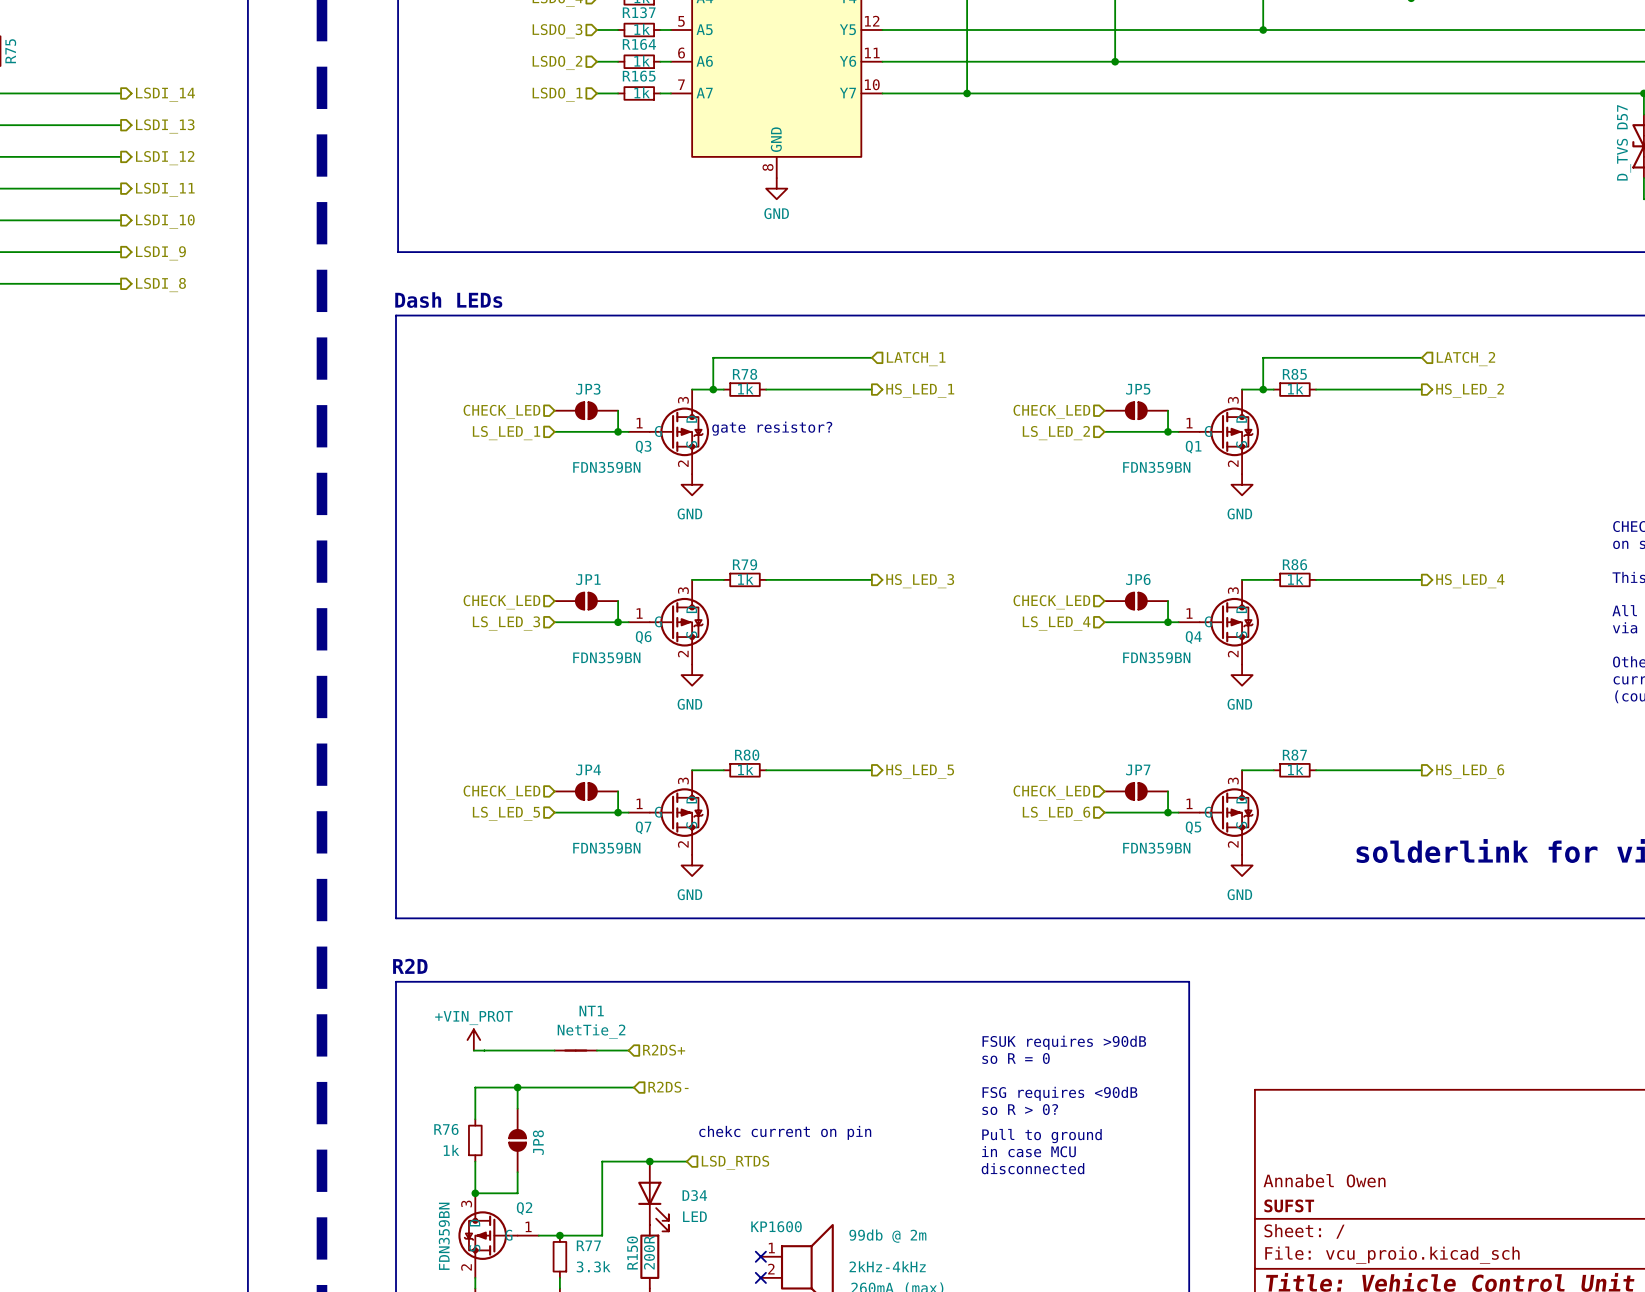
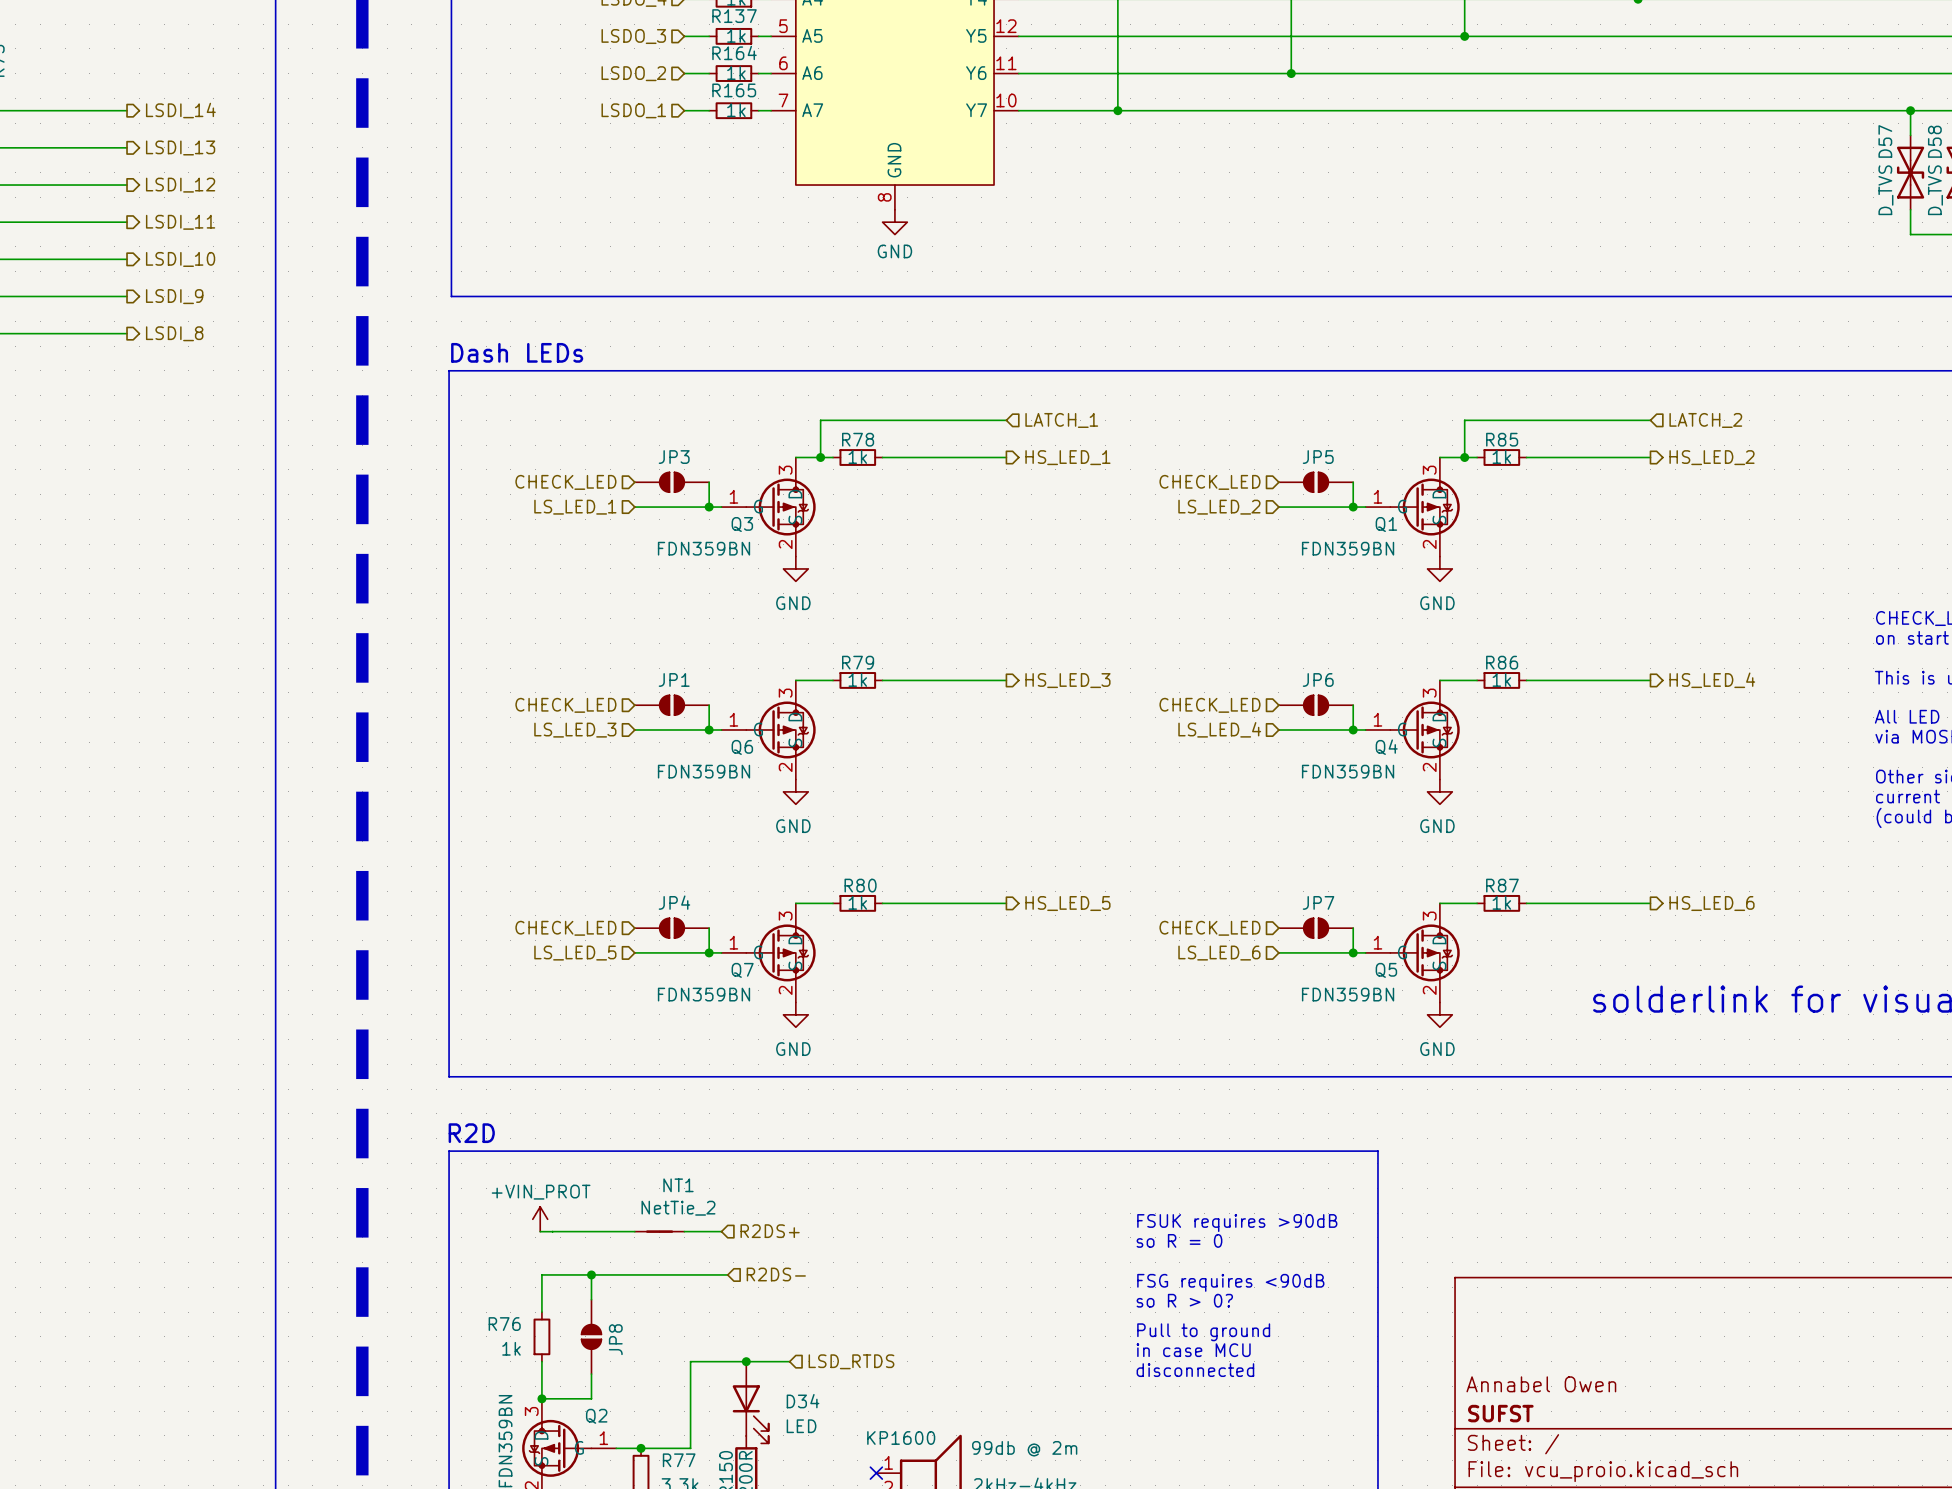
text: gate resistor? (772, 428) -> none
text: chekc current on pin (785, 1132) -> none

